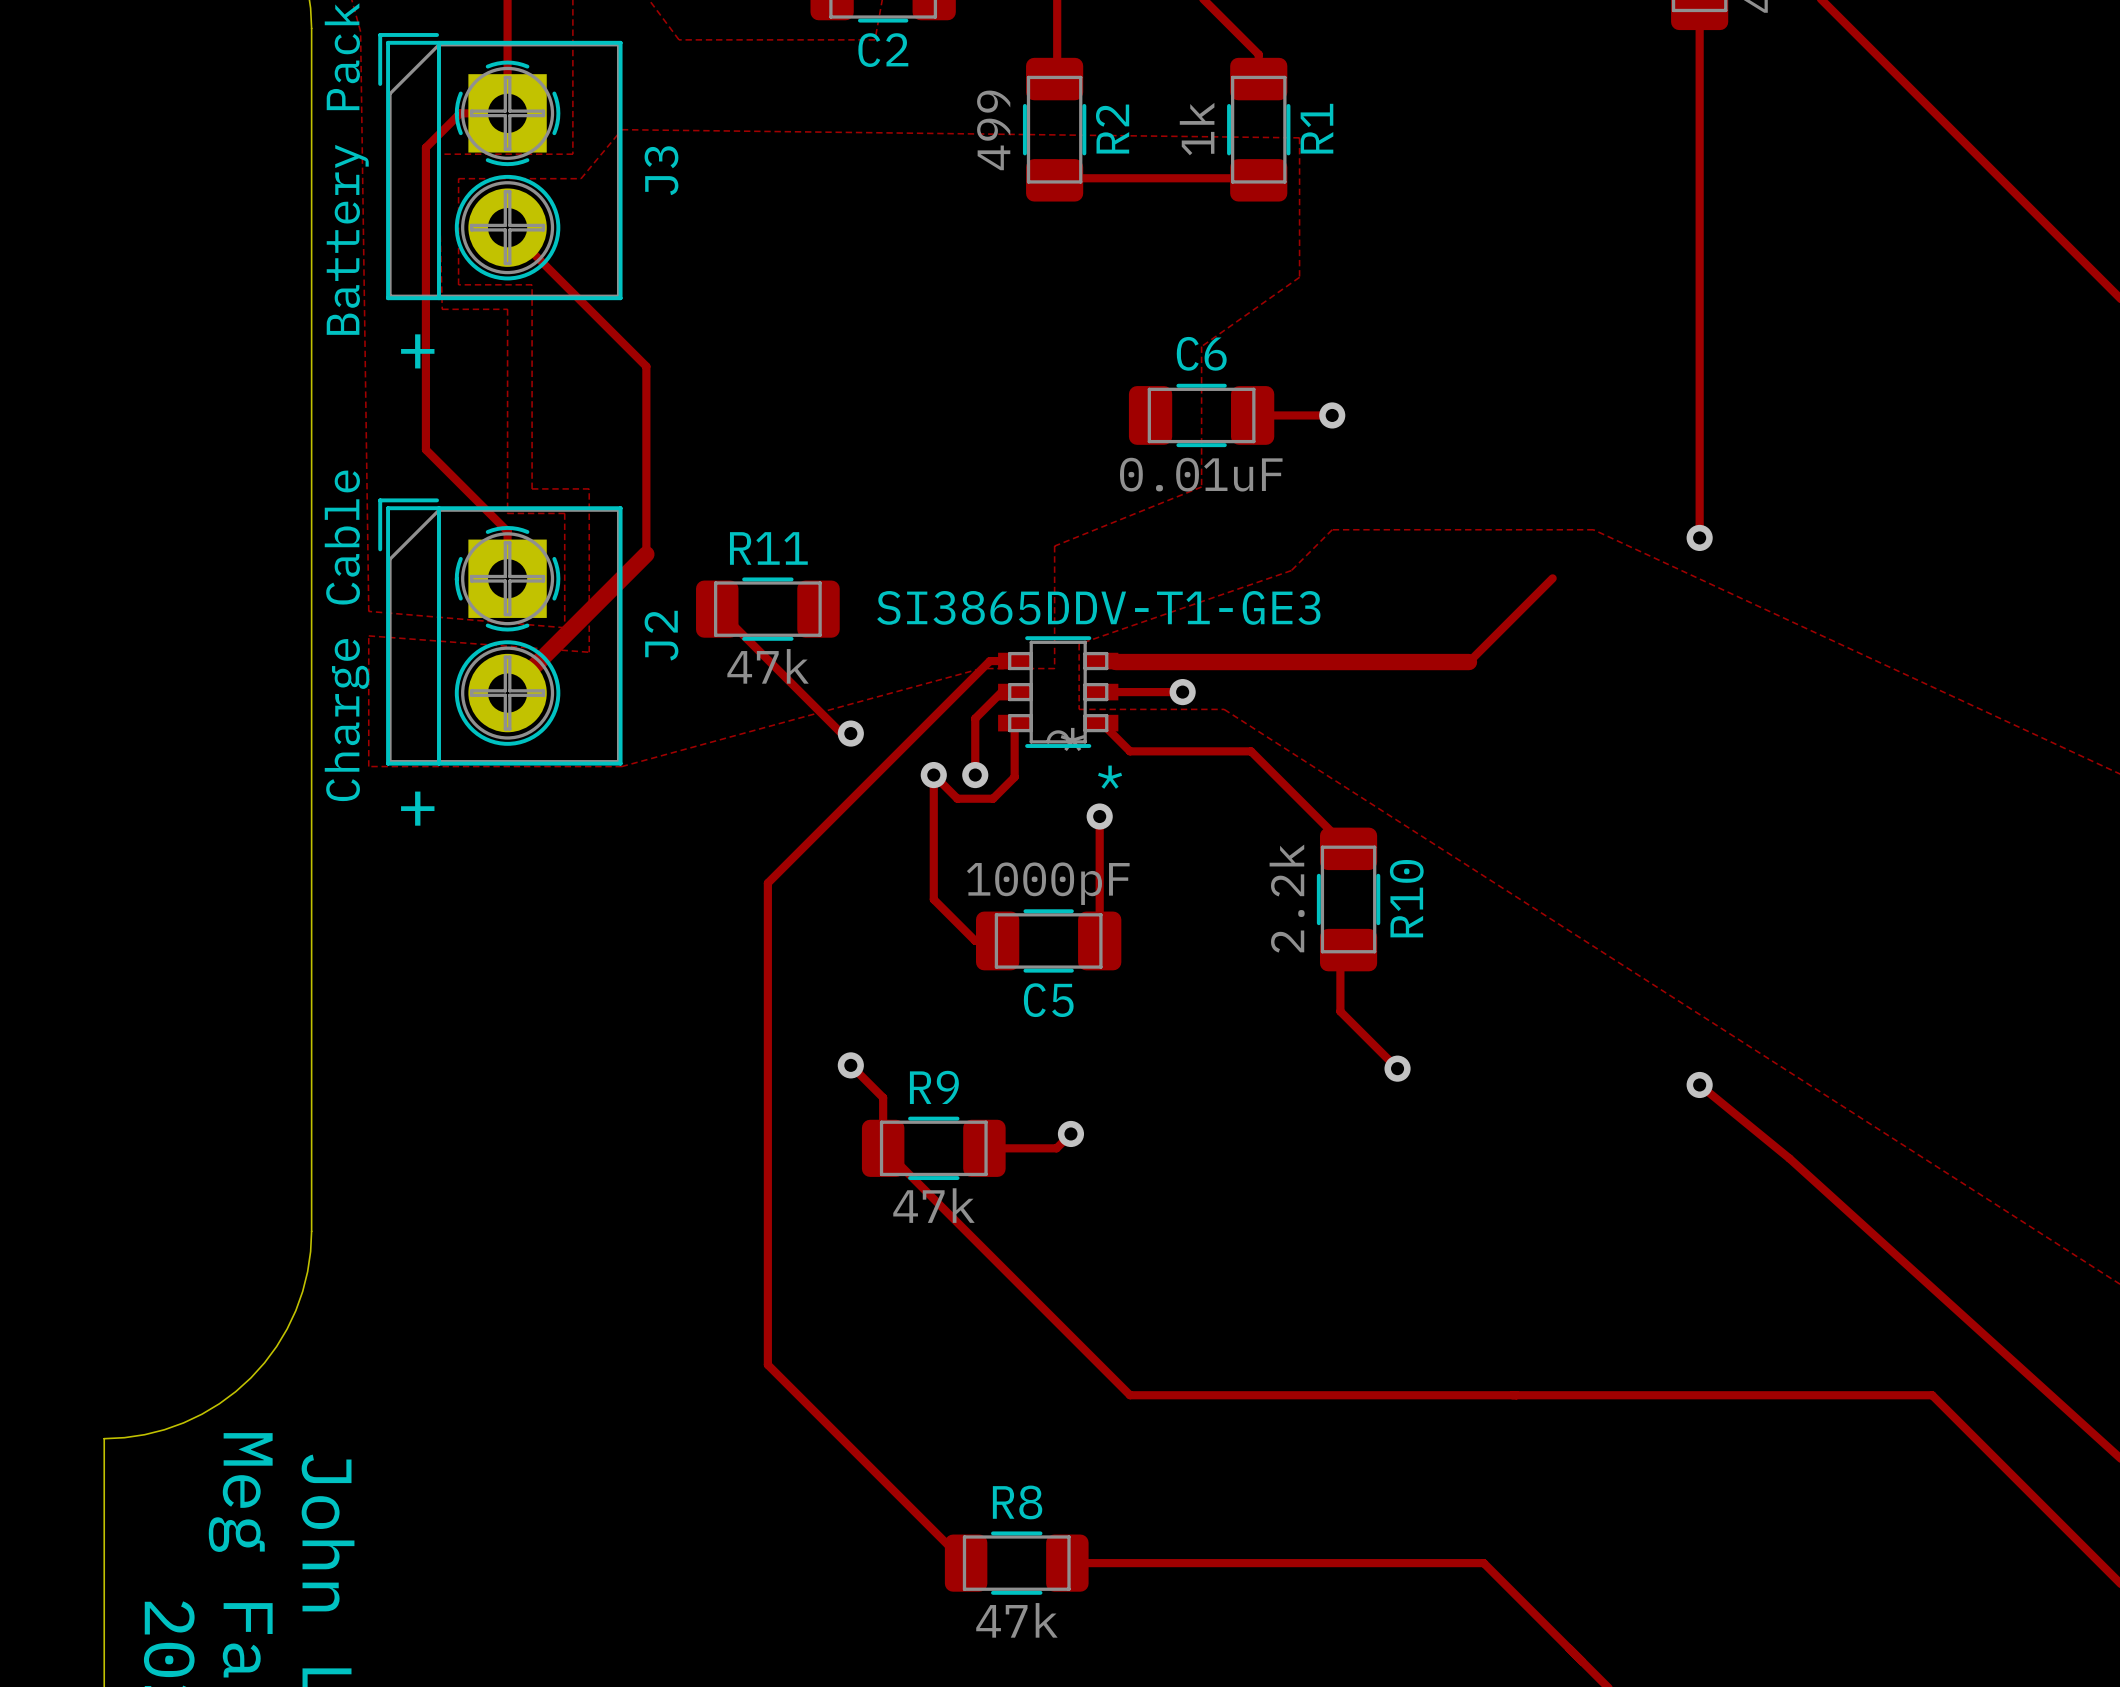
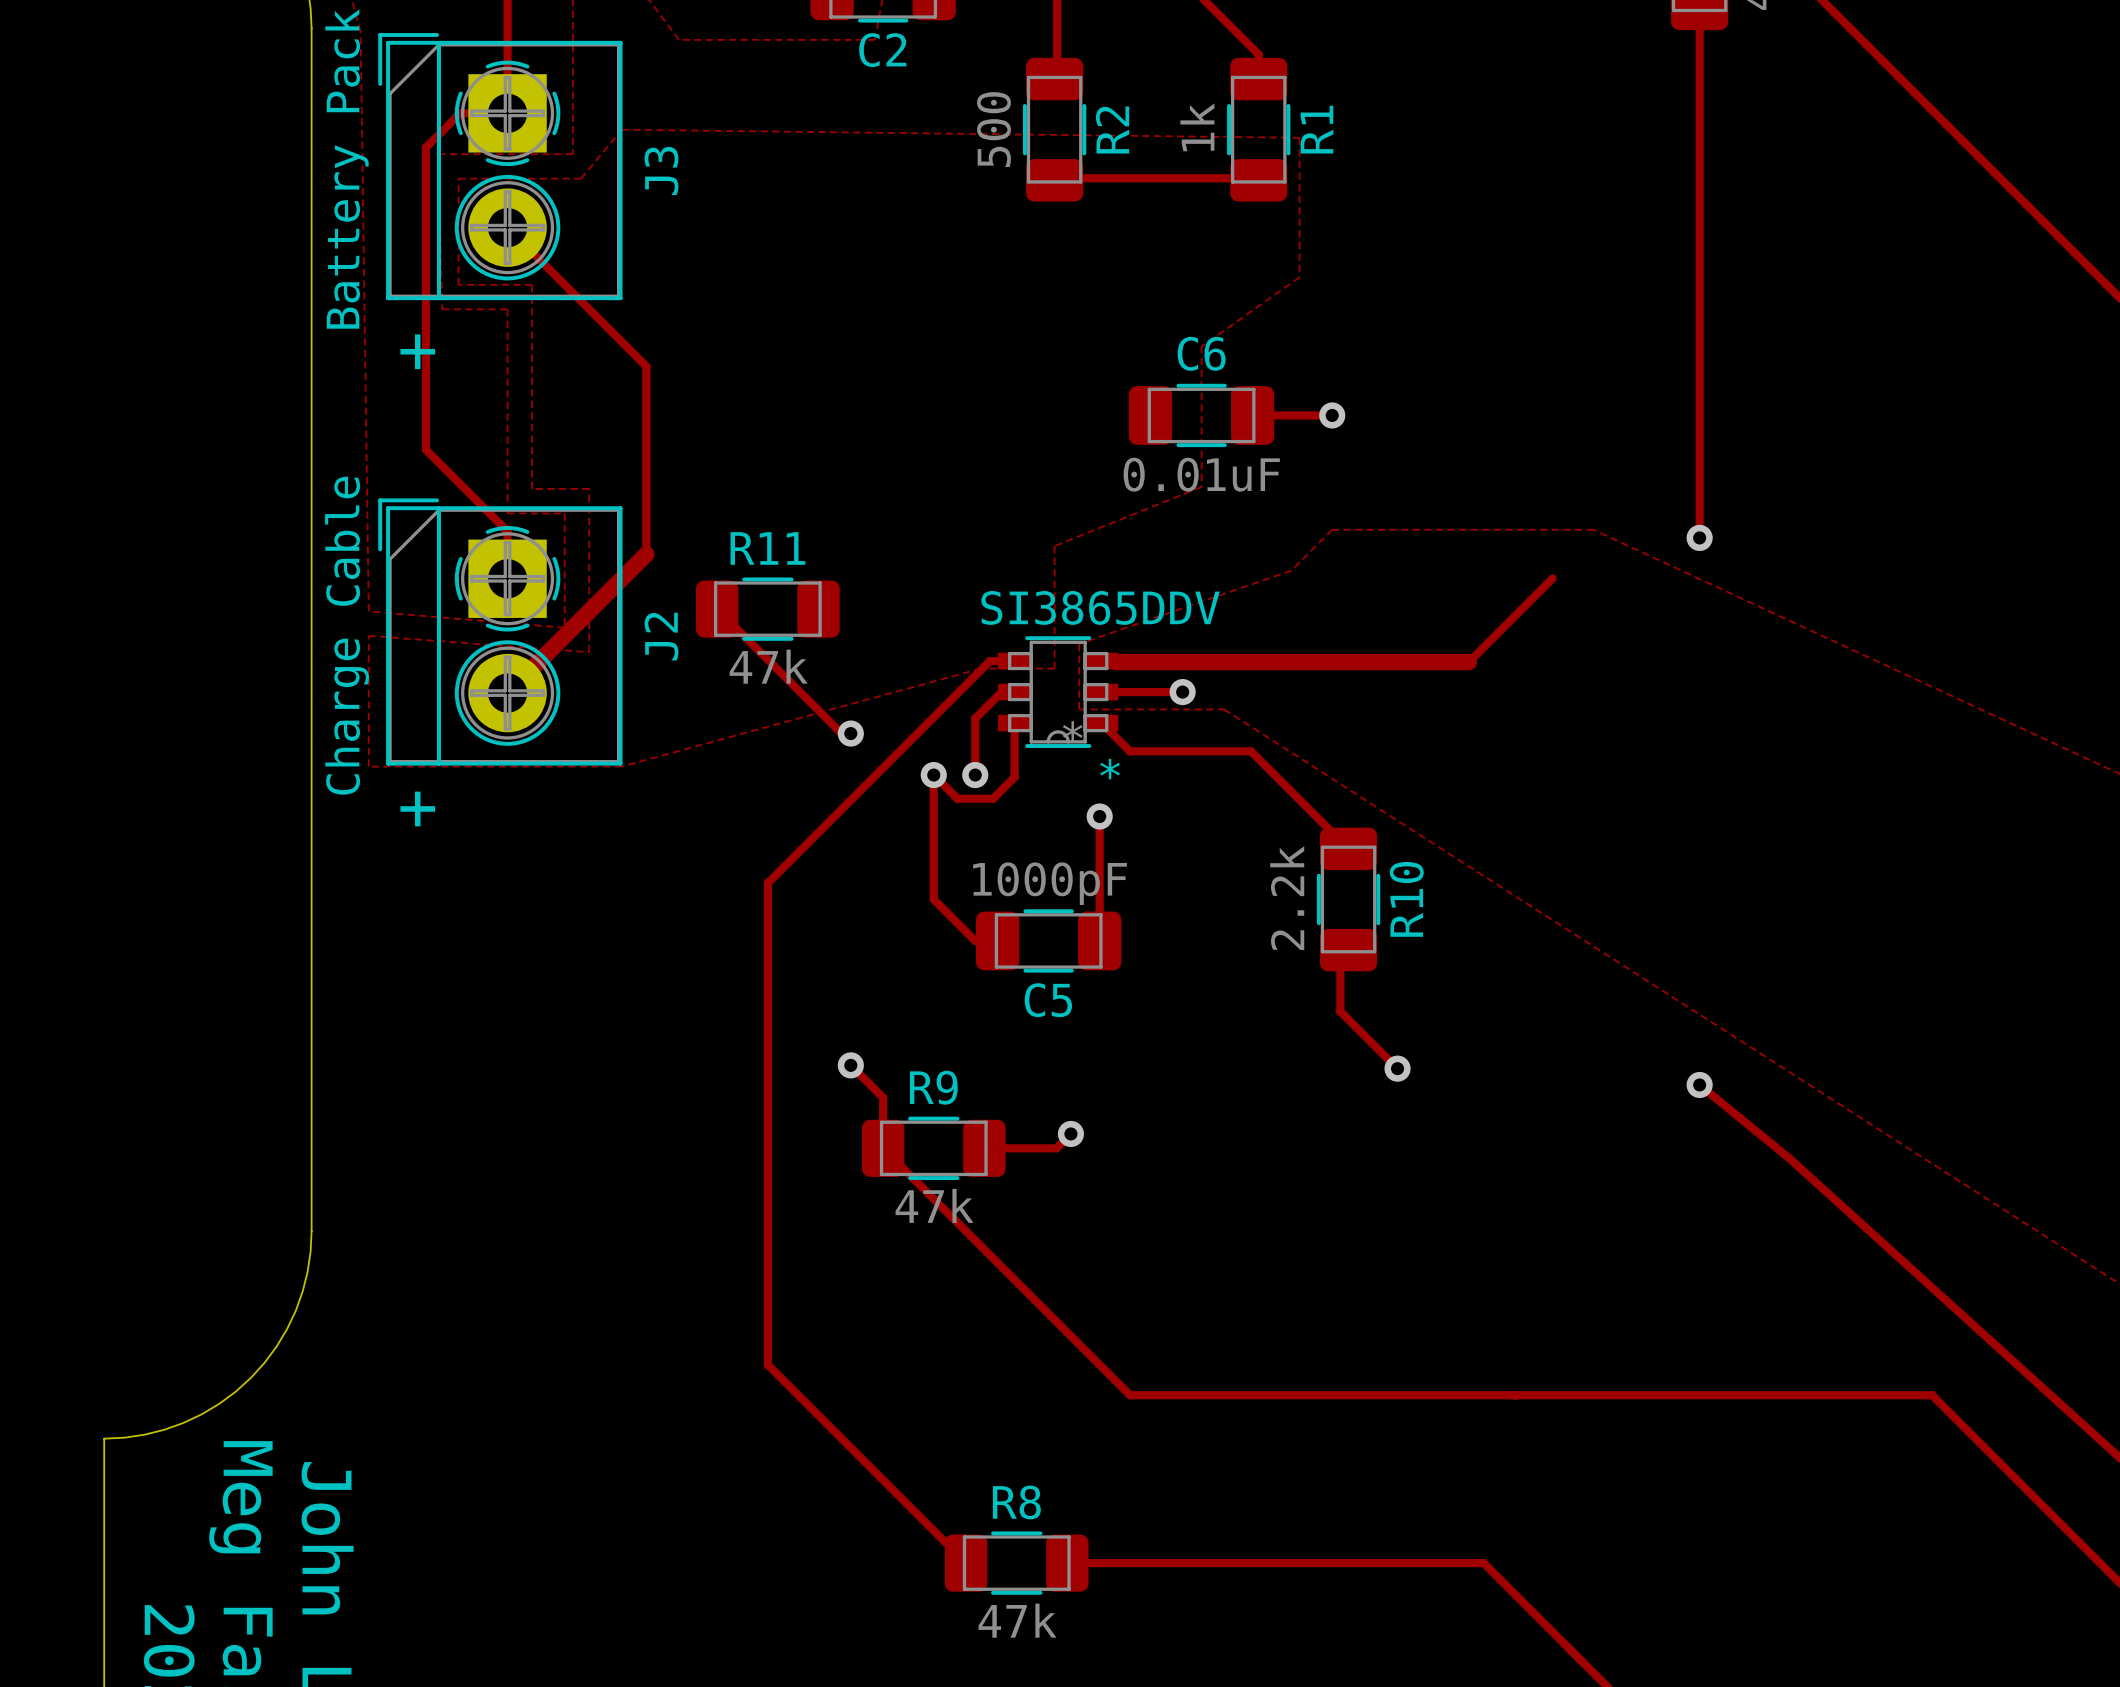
R2 value: 499 (993, 130) -> 500 (993, 129)
part value: SI3865DDV-T1-GE3 (1098, 607) -> SI3865DDV (1100, 607)

